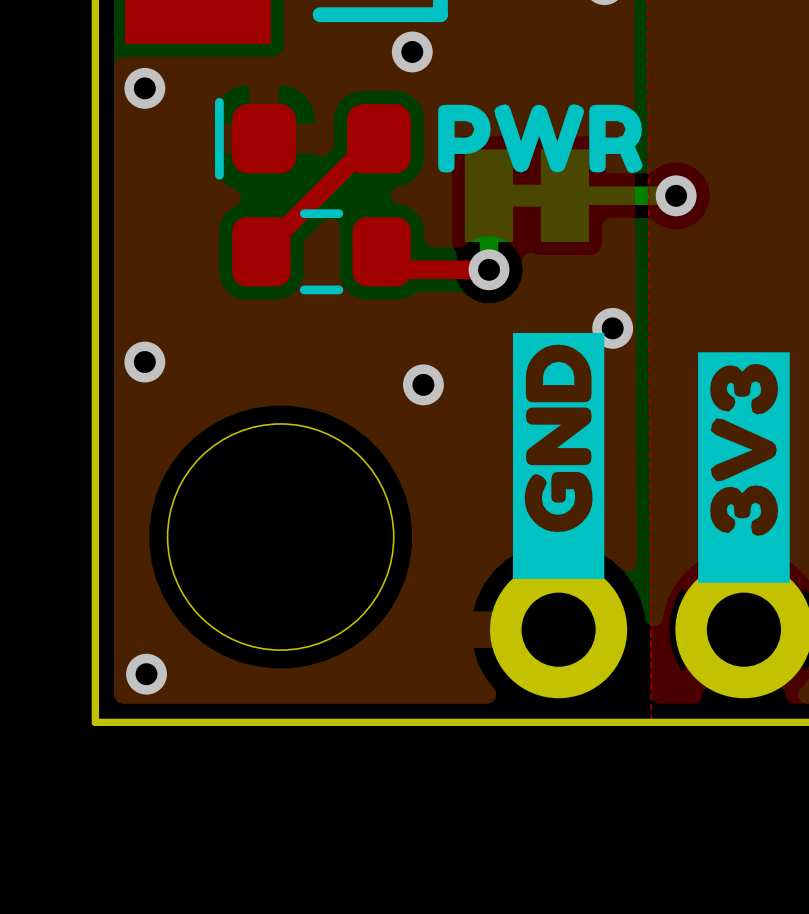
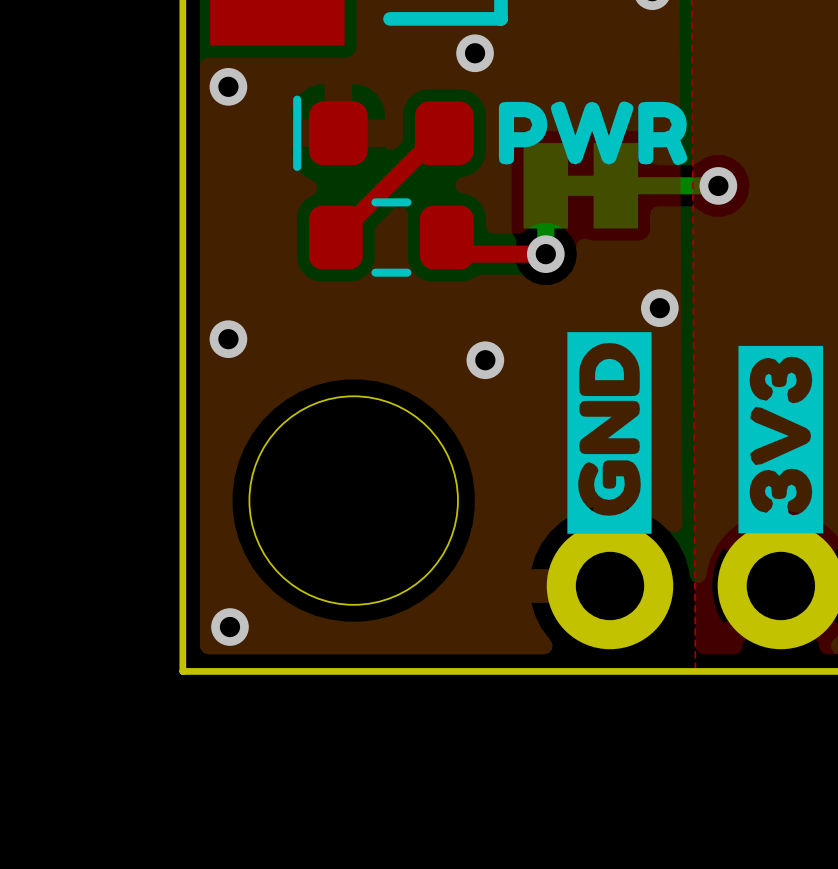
drawing shape: [512, 332, 605, 580] -> [567, 332, 652, 534]
drawing shape: [698, 352, 790, 583] -> [738, 345, 824, 534]

